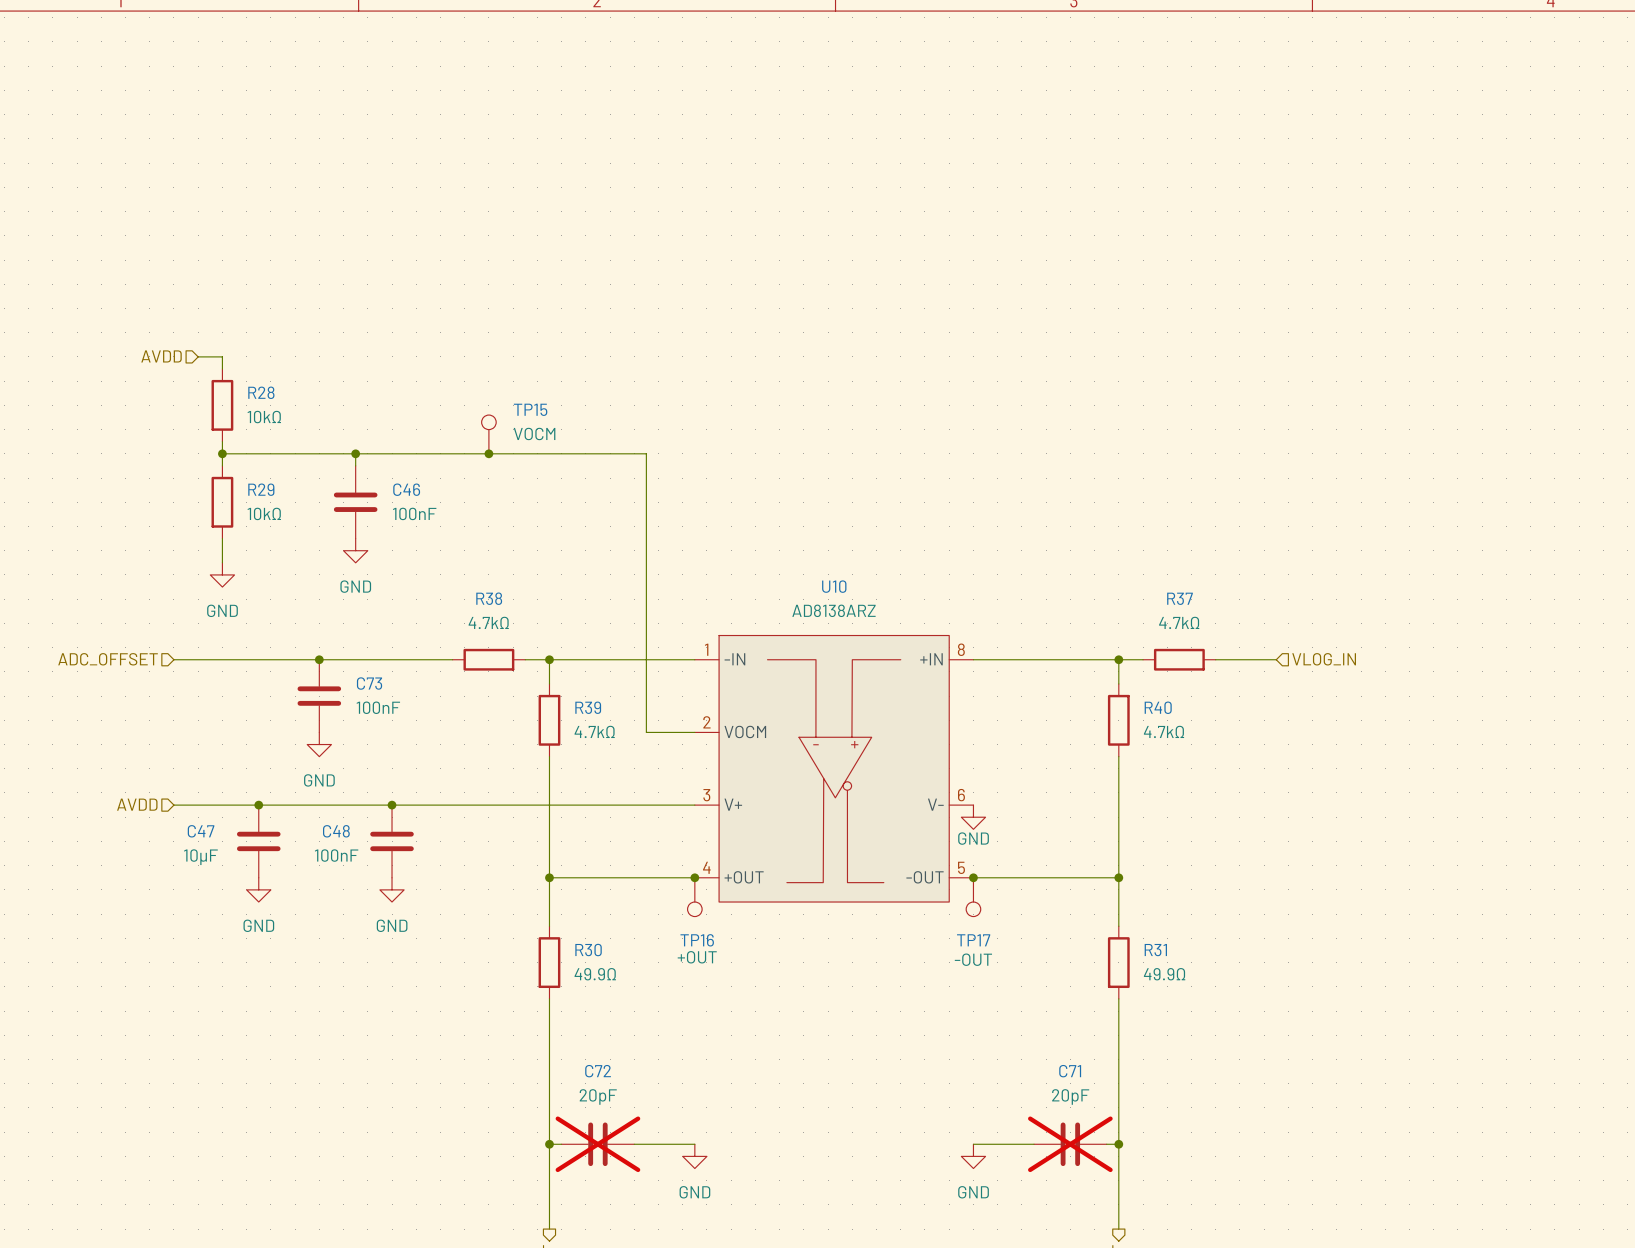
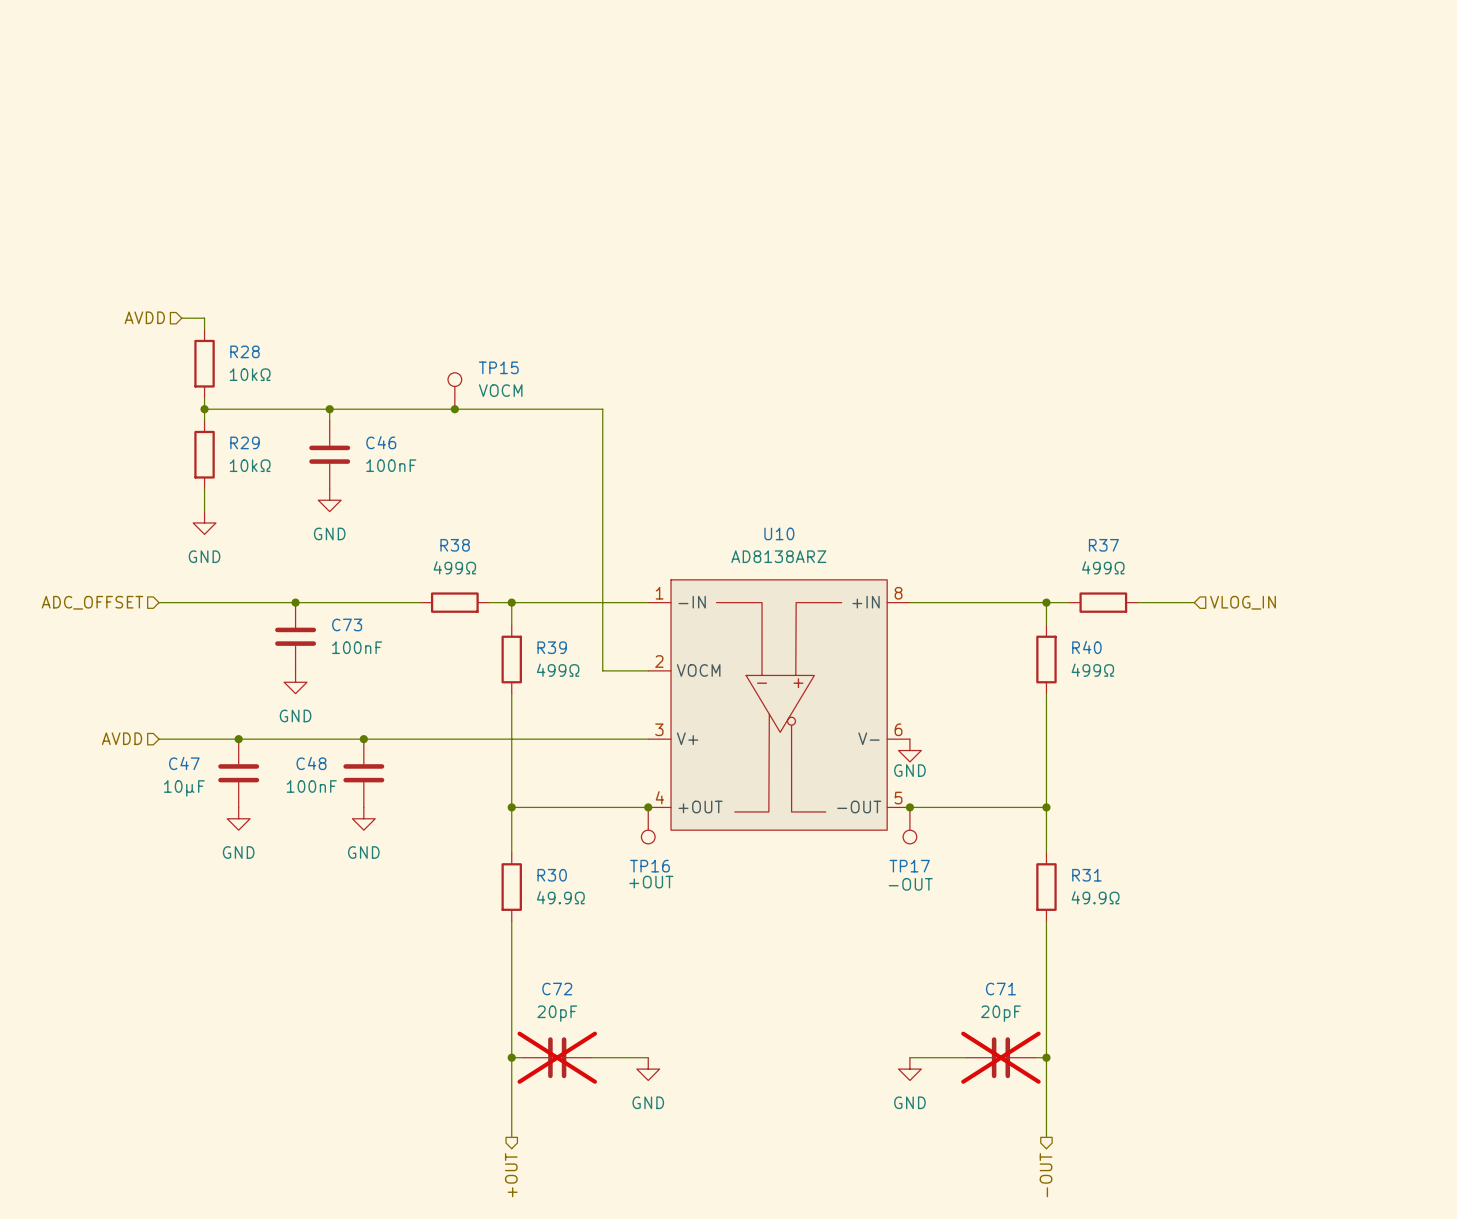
R38 value: 4.7kΩ (488, 622) -> 499Ω (454, 567)
R37 value: 4.7kΩ (1179, 622) -> 499Ω (1103, 567)
R39 value: 4.7kΩ (594, 731) -> 499Ω (558, 670)
R40 value: 4.7kΩ (1163, 731) -> 499Ω (1092, 670)

